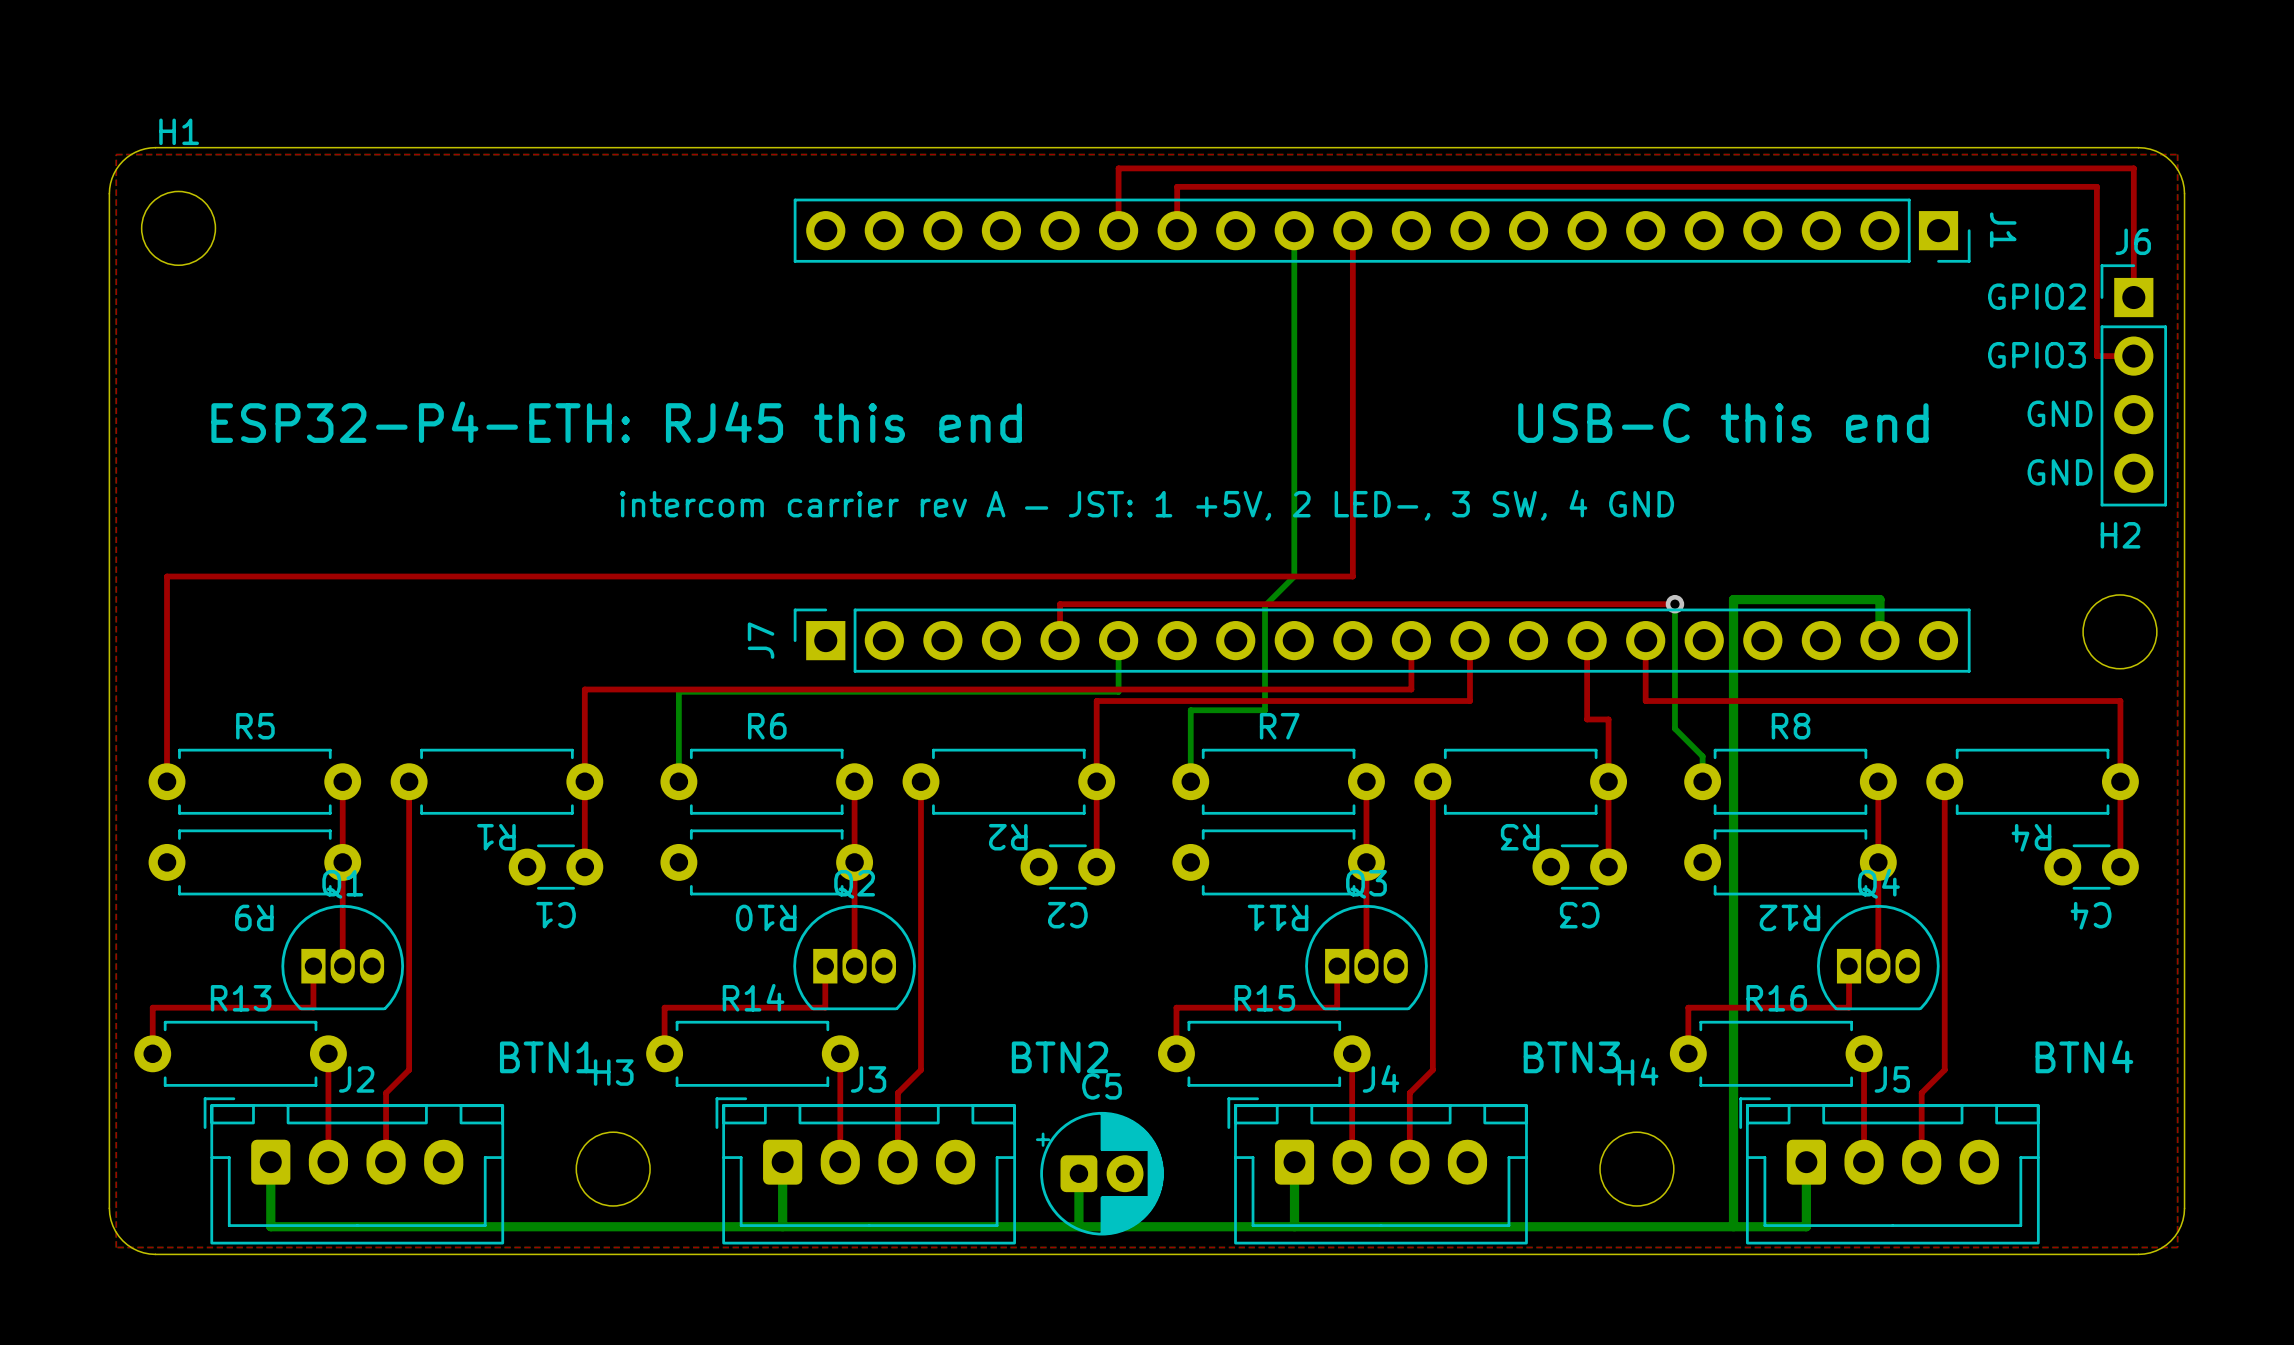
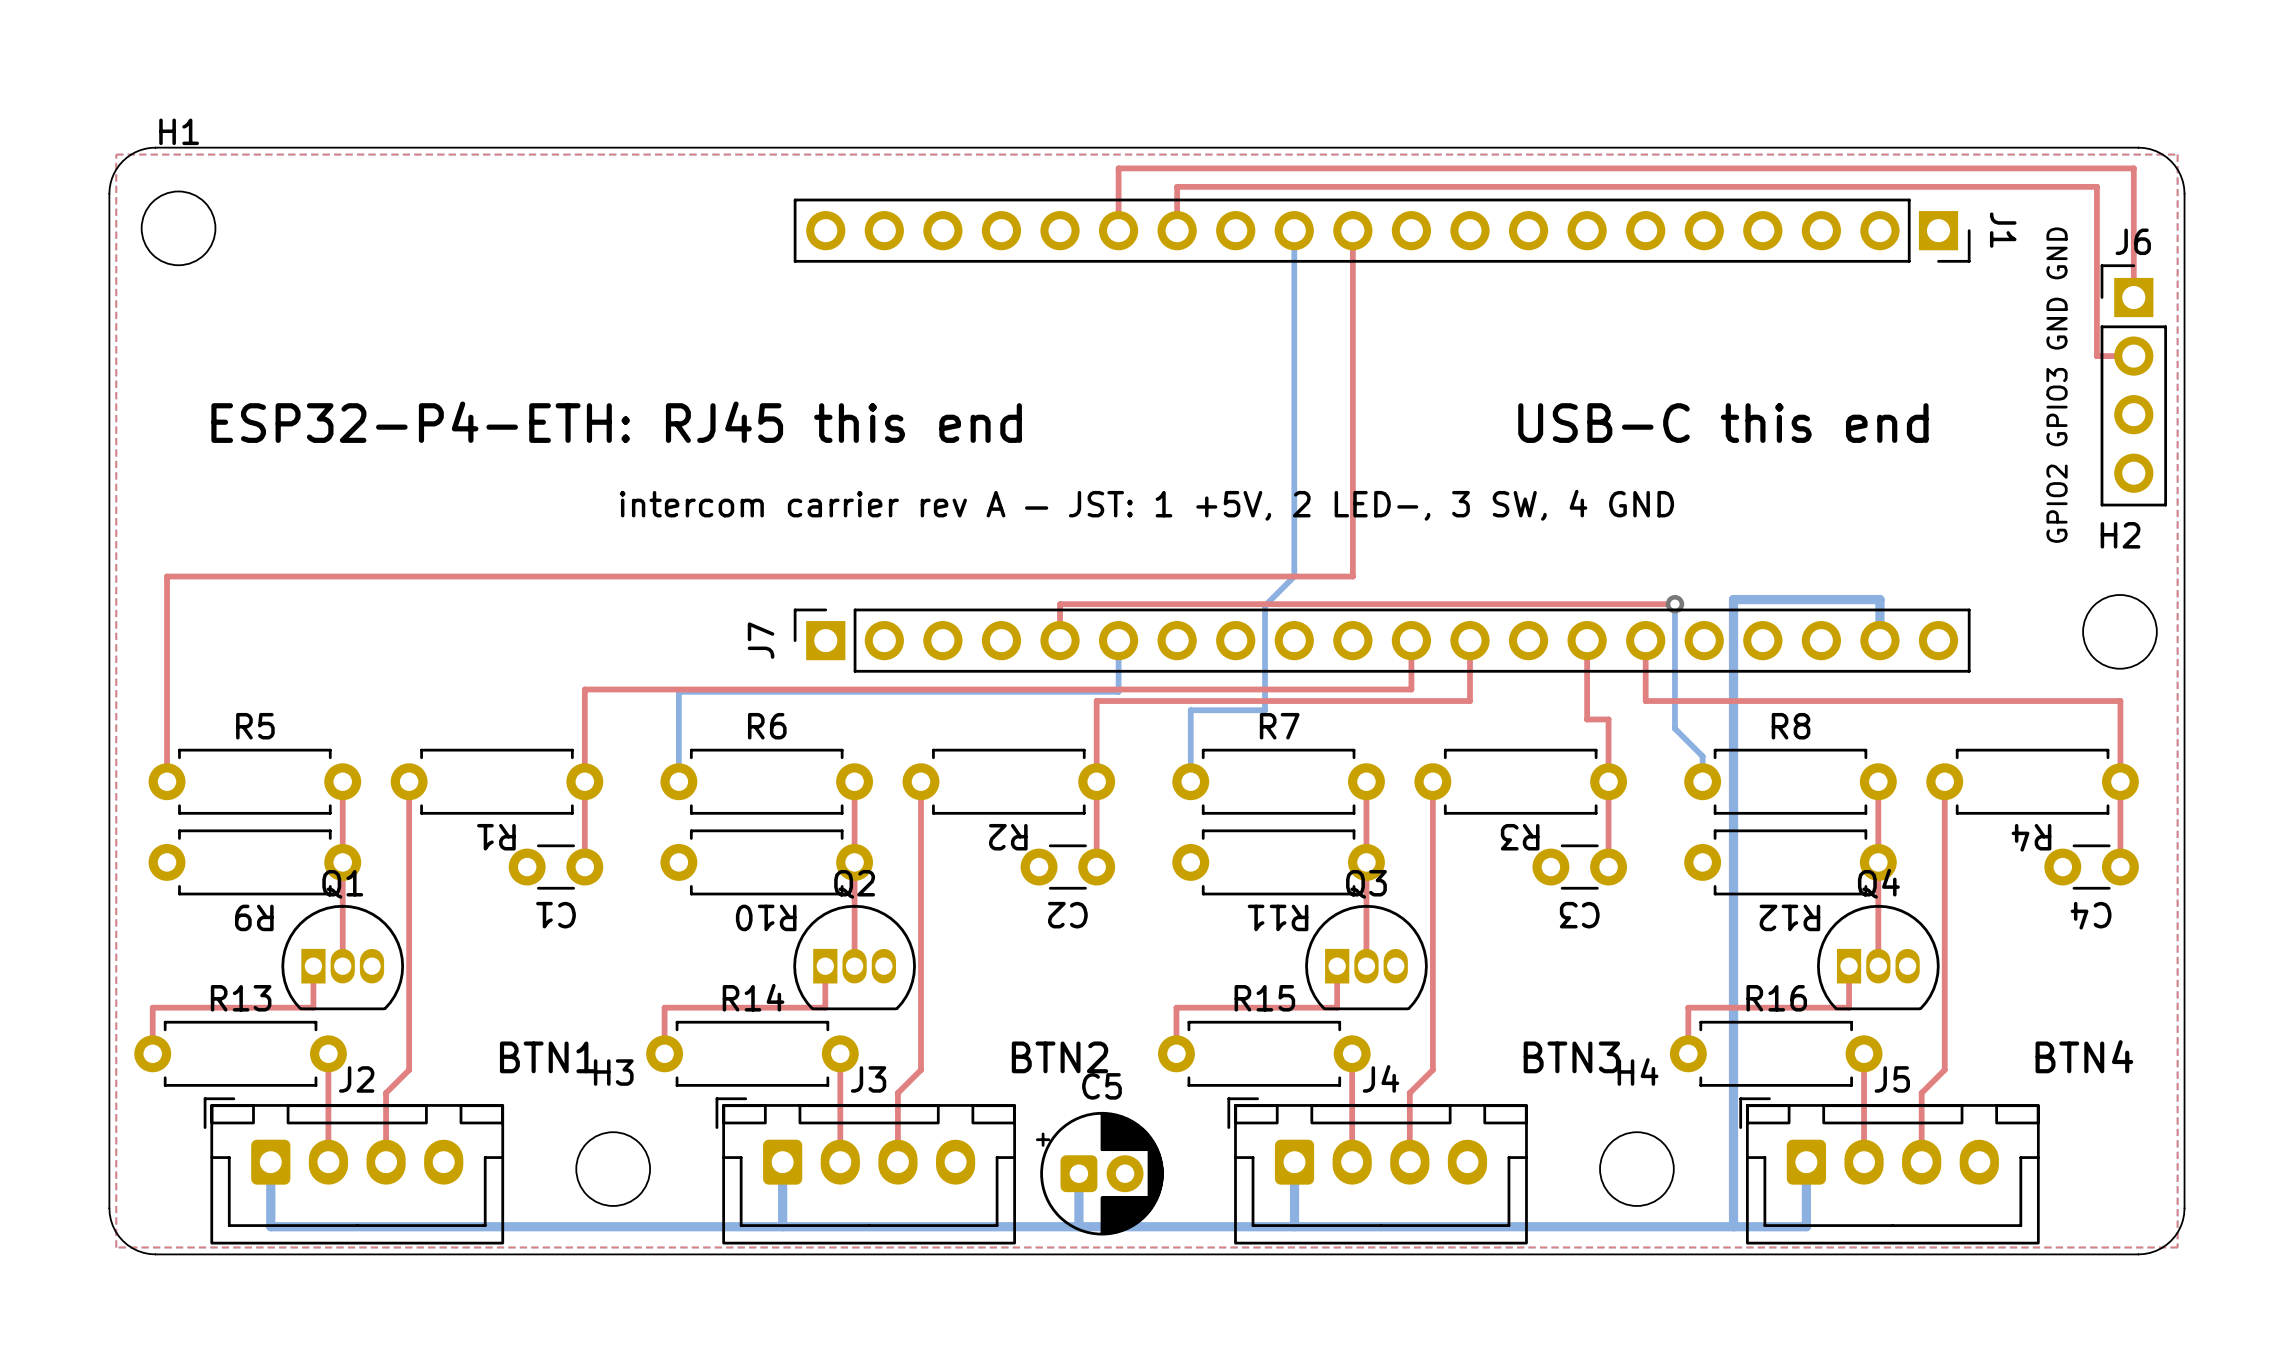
text: GPIO2 (2036, 296) -> none
text: GPIO3 (2036, 355) -> none
text: none -> GPIO2 GPIO3 GND GND (2057, 385)
text: GND (2060, 413) -> none
text: GND (2060, 472) -> none

